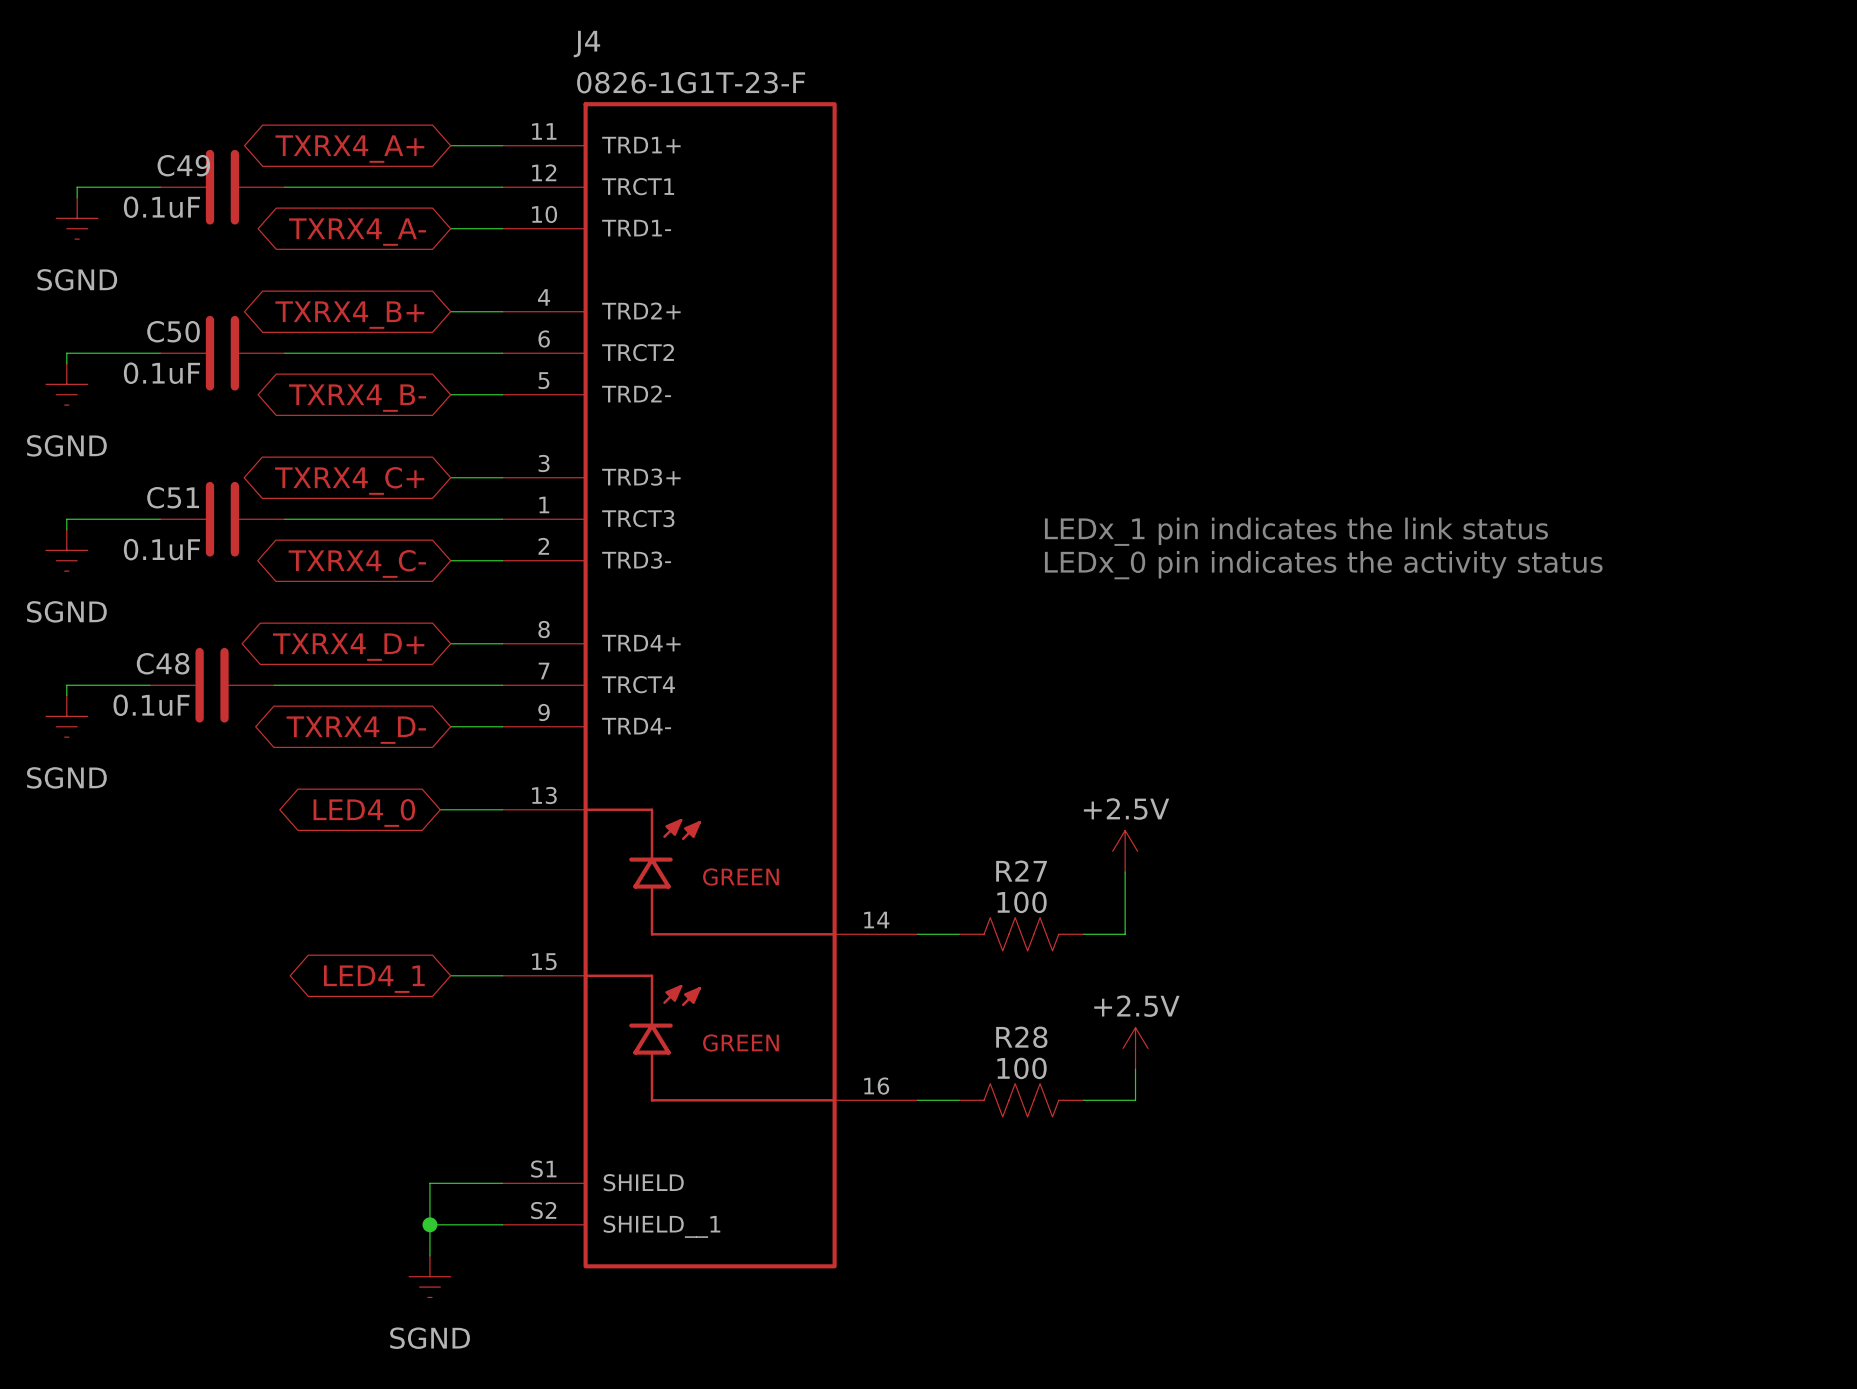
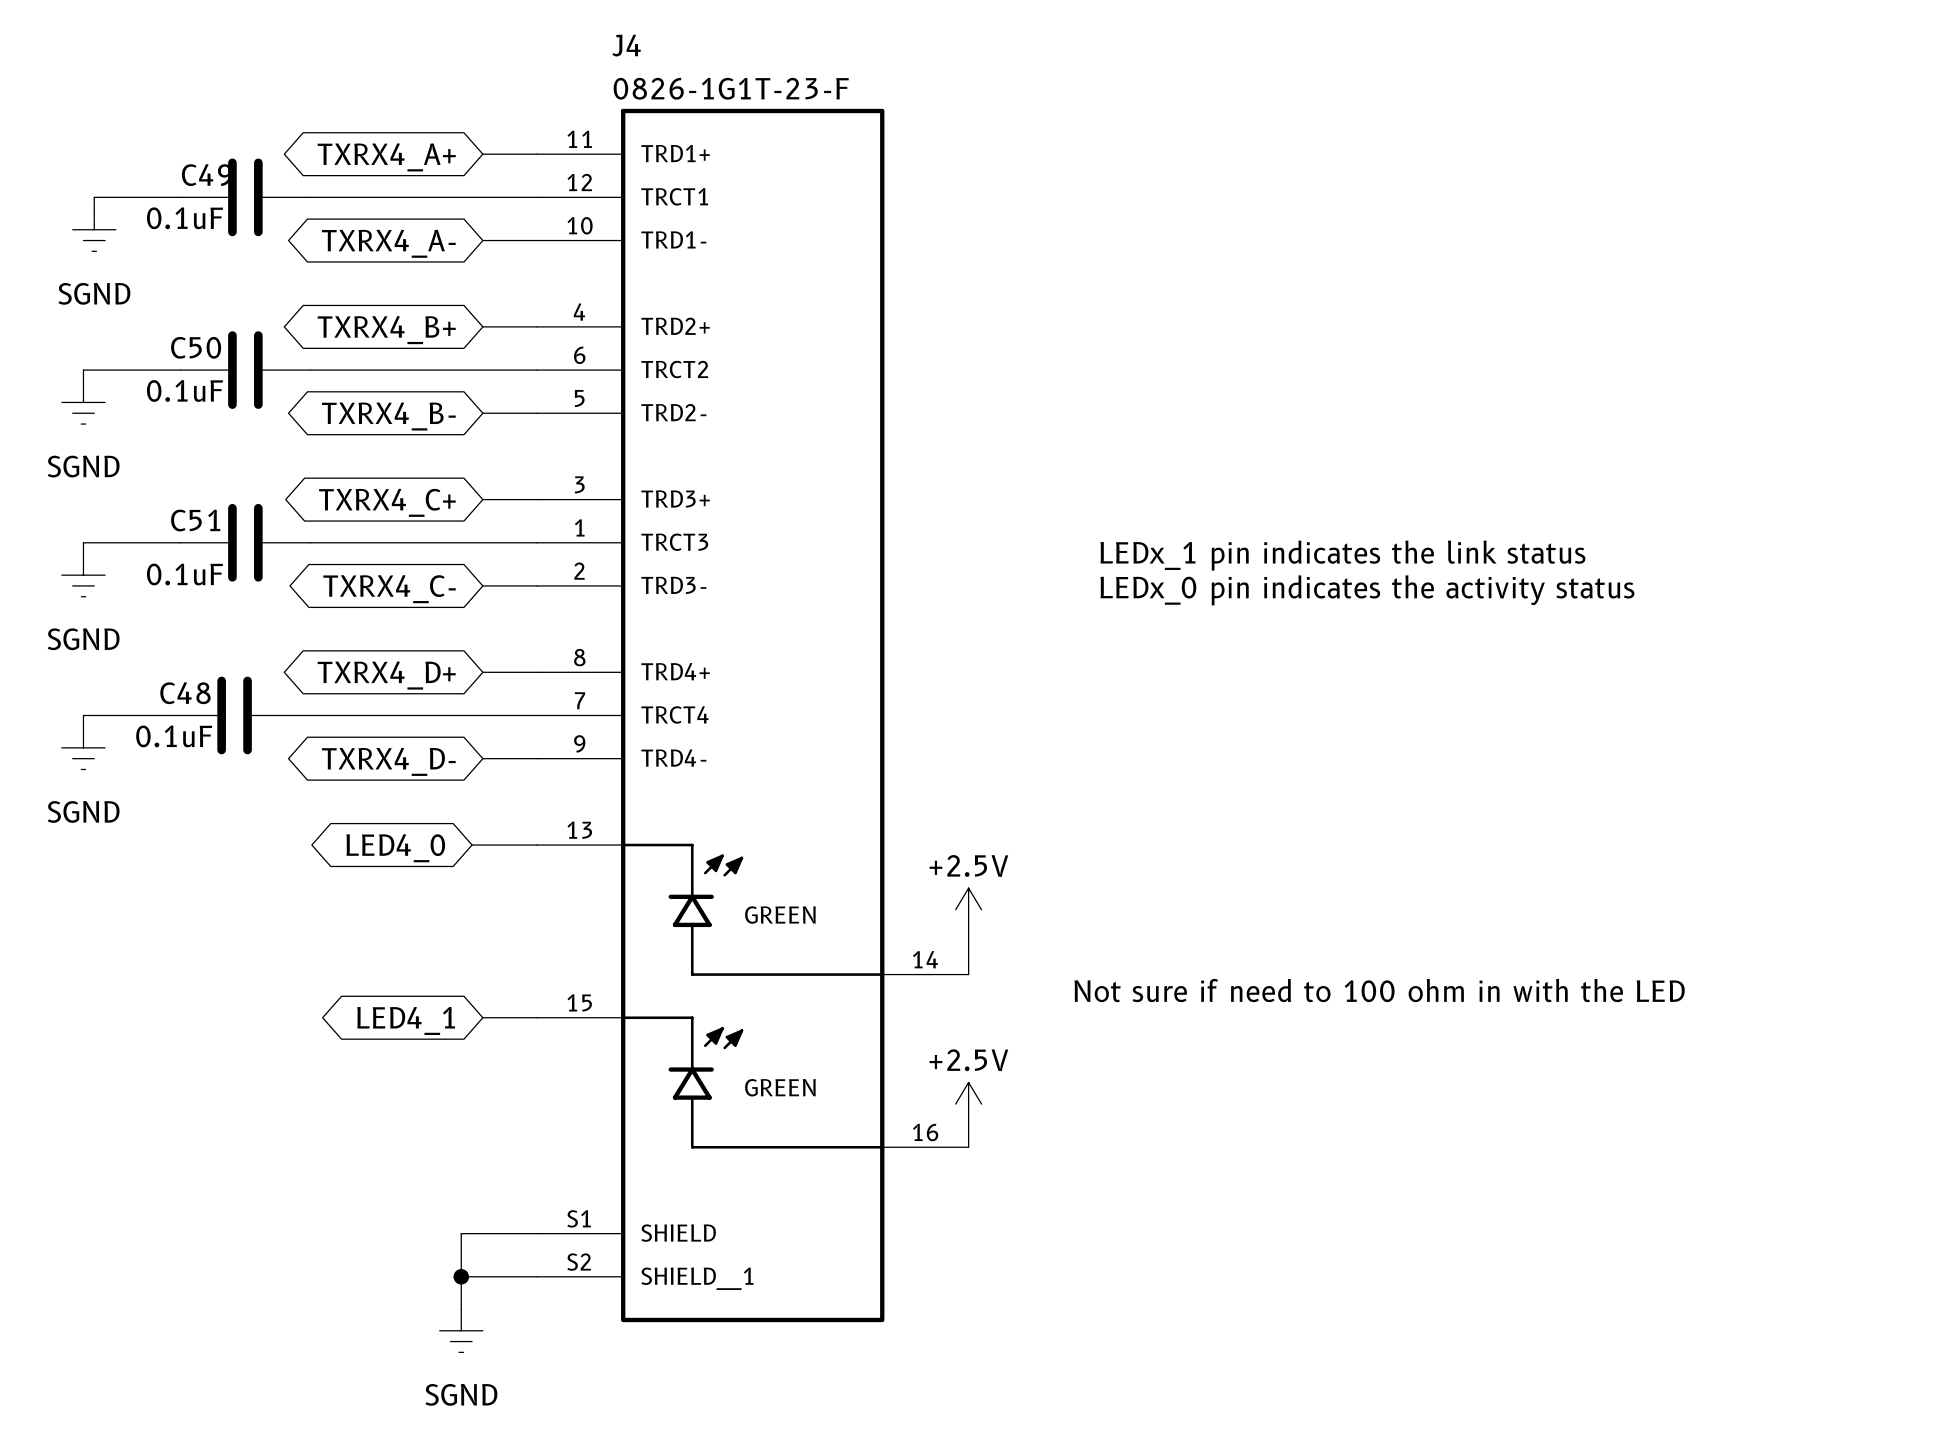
power symbol: +2.5V (1125, 851) -> none
power symbol: none -> +2.5V (968, 909)
wire: (1125, 872) (1125, 934) (1083, 934) -> none
wire: (917, 934) (959, 934) -> (968, 974) (968, 931)
R27: 100 (1021, 934) -> none
text: none -> Not sure if need to 100 ohm in with the LED (1379, 990)
power symbol: +2.5V (1135, 1048) -> none
power symbol: none -> +2.5V (968, 1104)
wire: (1135, 1069) (1135, 1100) (1083, 1100) -> none
wire: (917, 1100) (959, 1100) -> (968, 1147) (968, 1125)
R28: 100 (1021, 1100) -> none

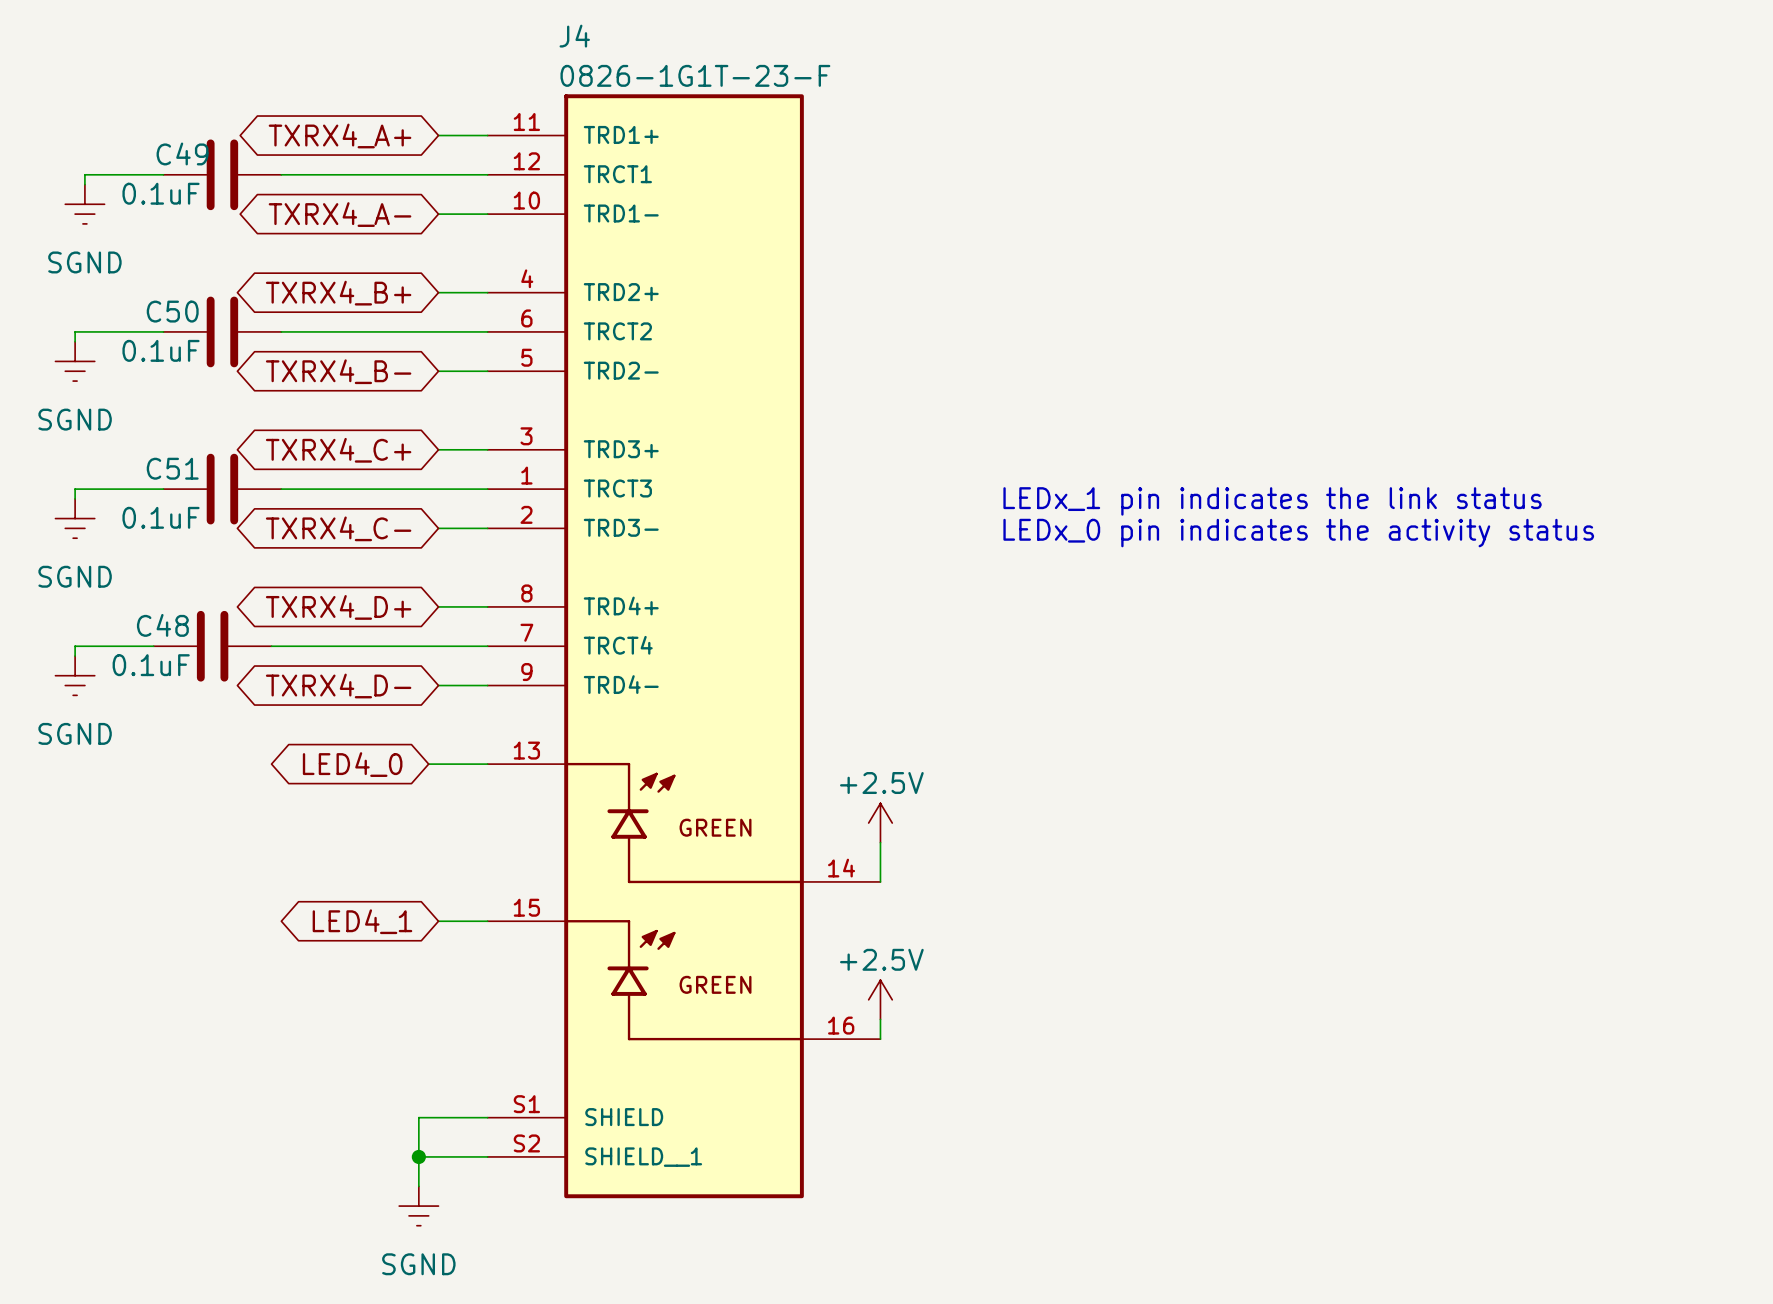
text: Not sure if need to 100 ohm in with the LED (1379, 990) -> none

